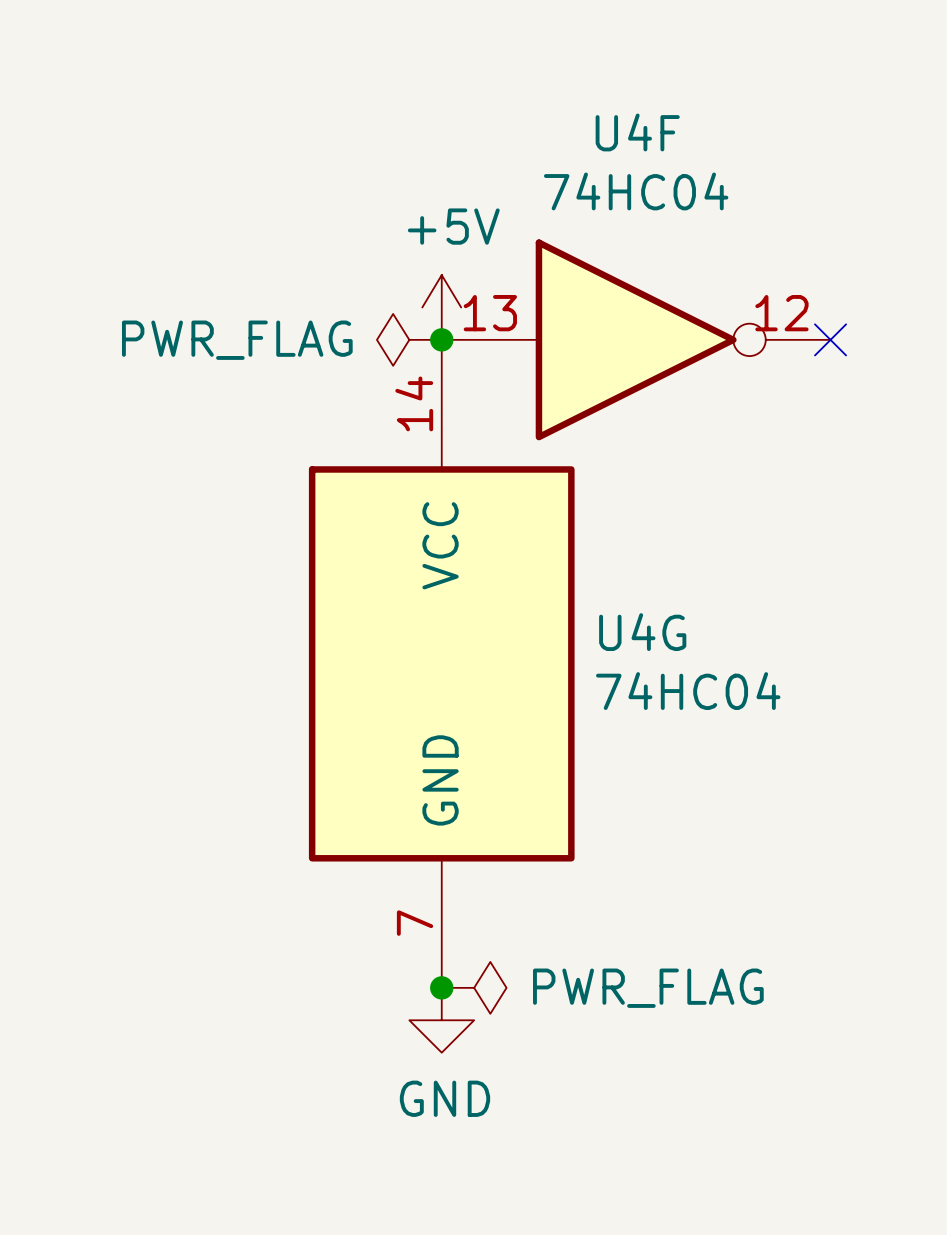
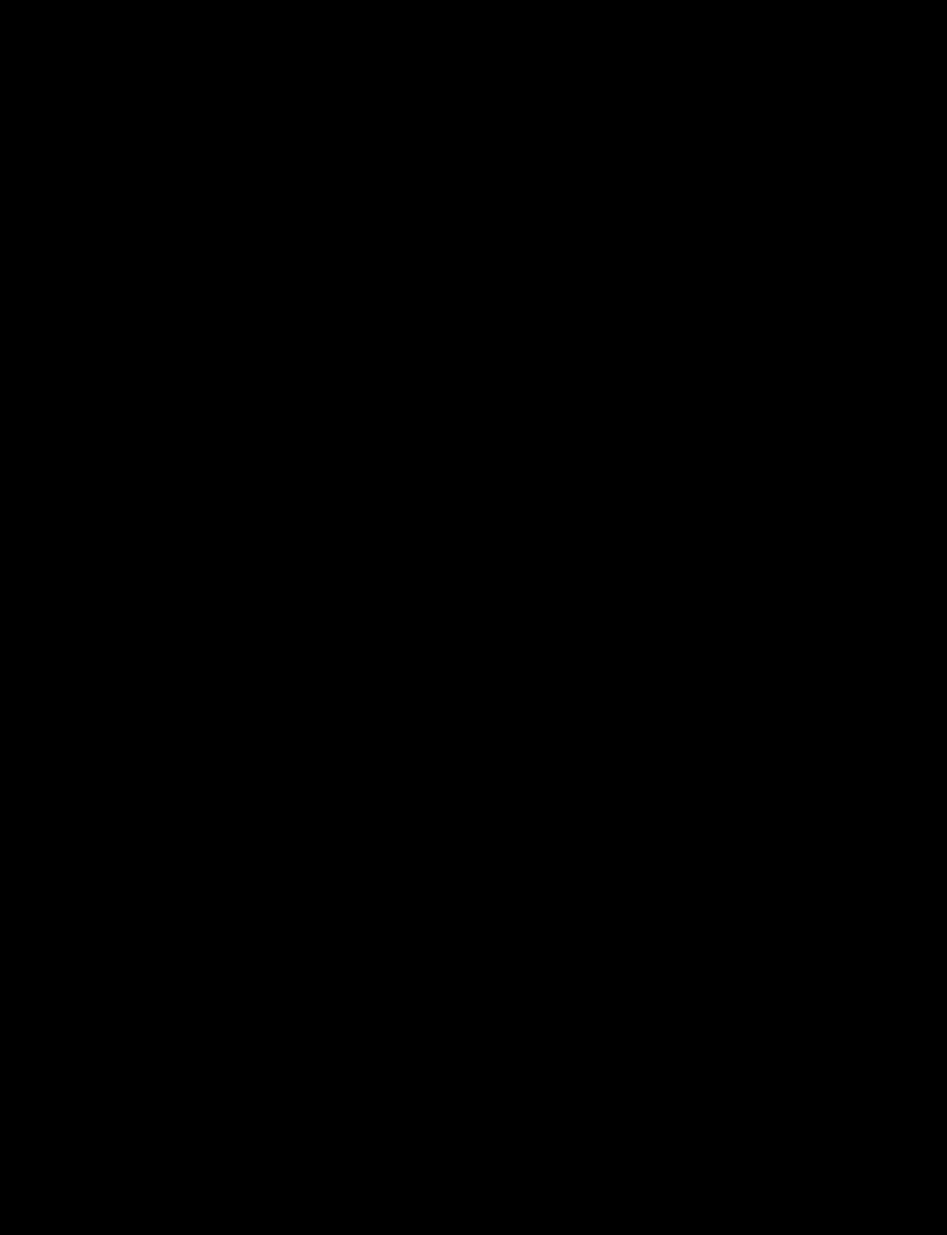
power symbol: +5V (441, 307) -> none
power symbol: PWR_FLAG (409, 339) -> none
junction: (441, 339) -> none
U4F: 74HC04 (636, 339) -> none
no-connect mark: (830, 339) -> none
U4G: 74HC04 (441, 663) -> none
junction: (441, 987) -> none
power symbol: PWR_FLAG (474, 987) -> none
power symbol: GND (441, 1020) -> none

